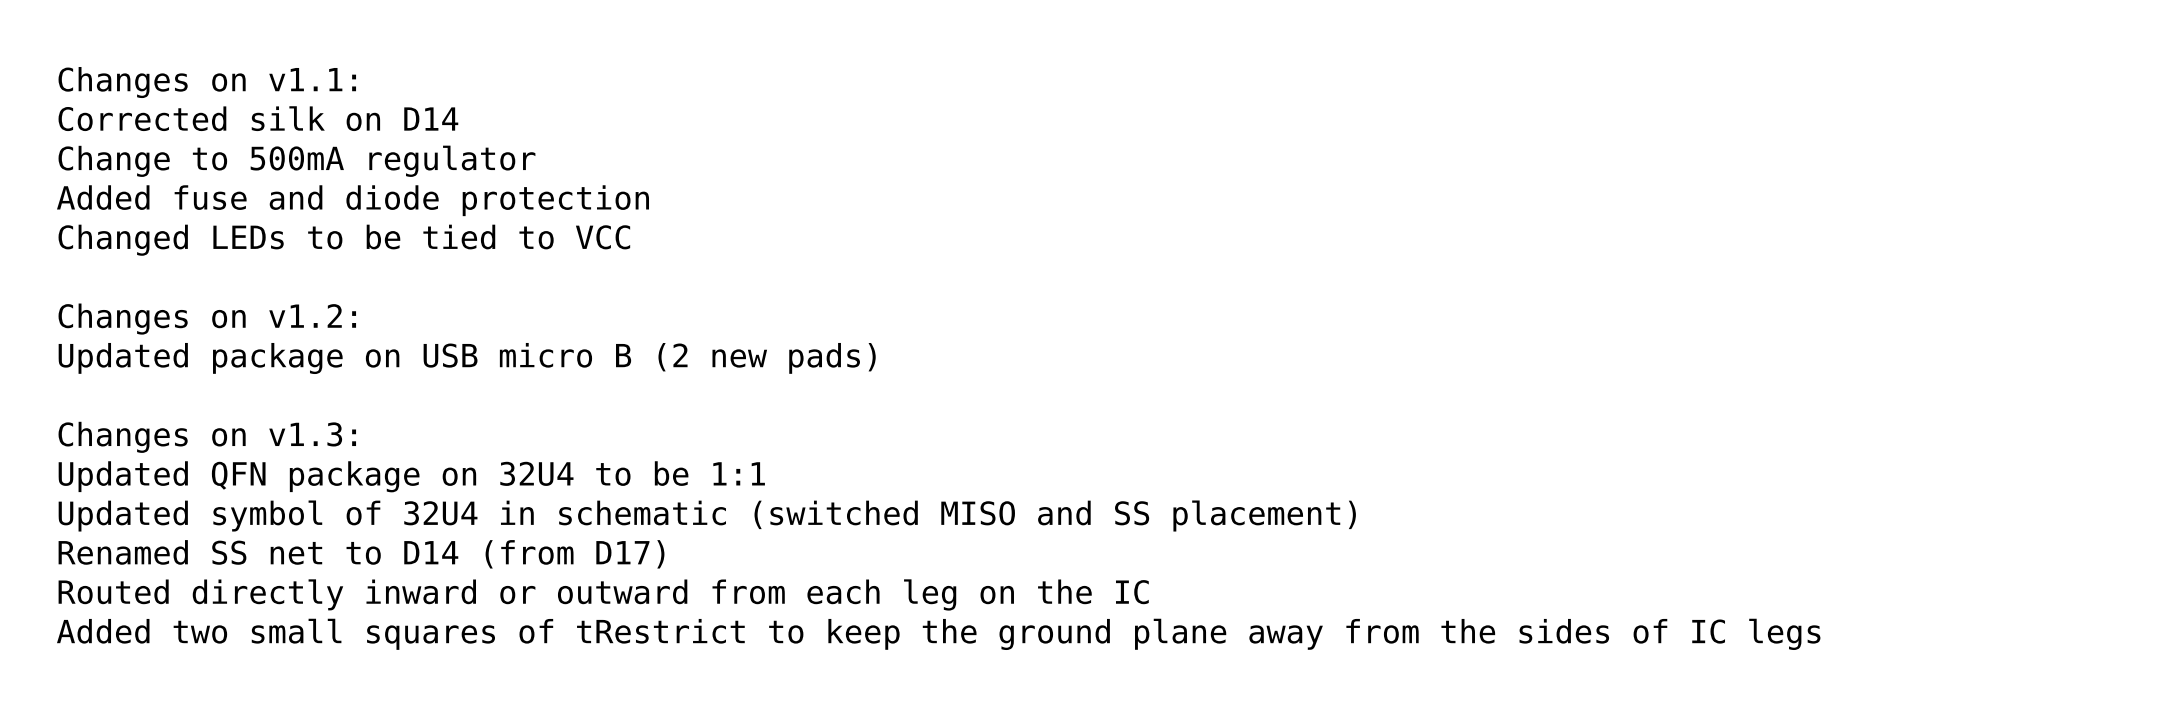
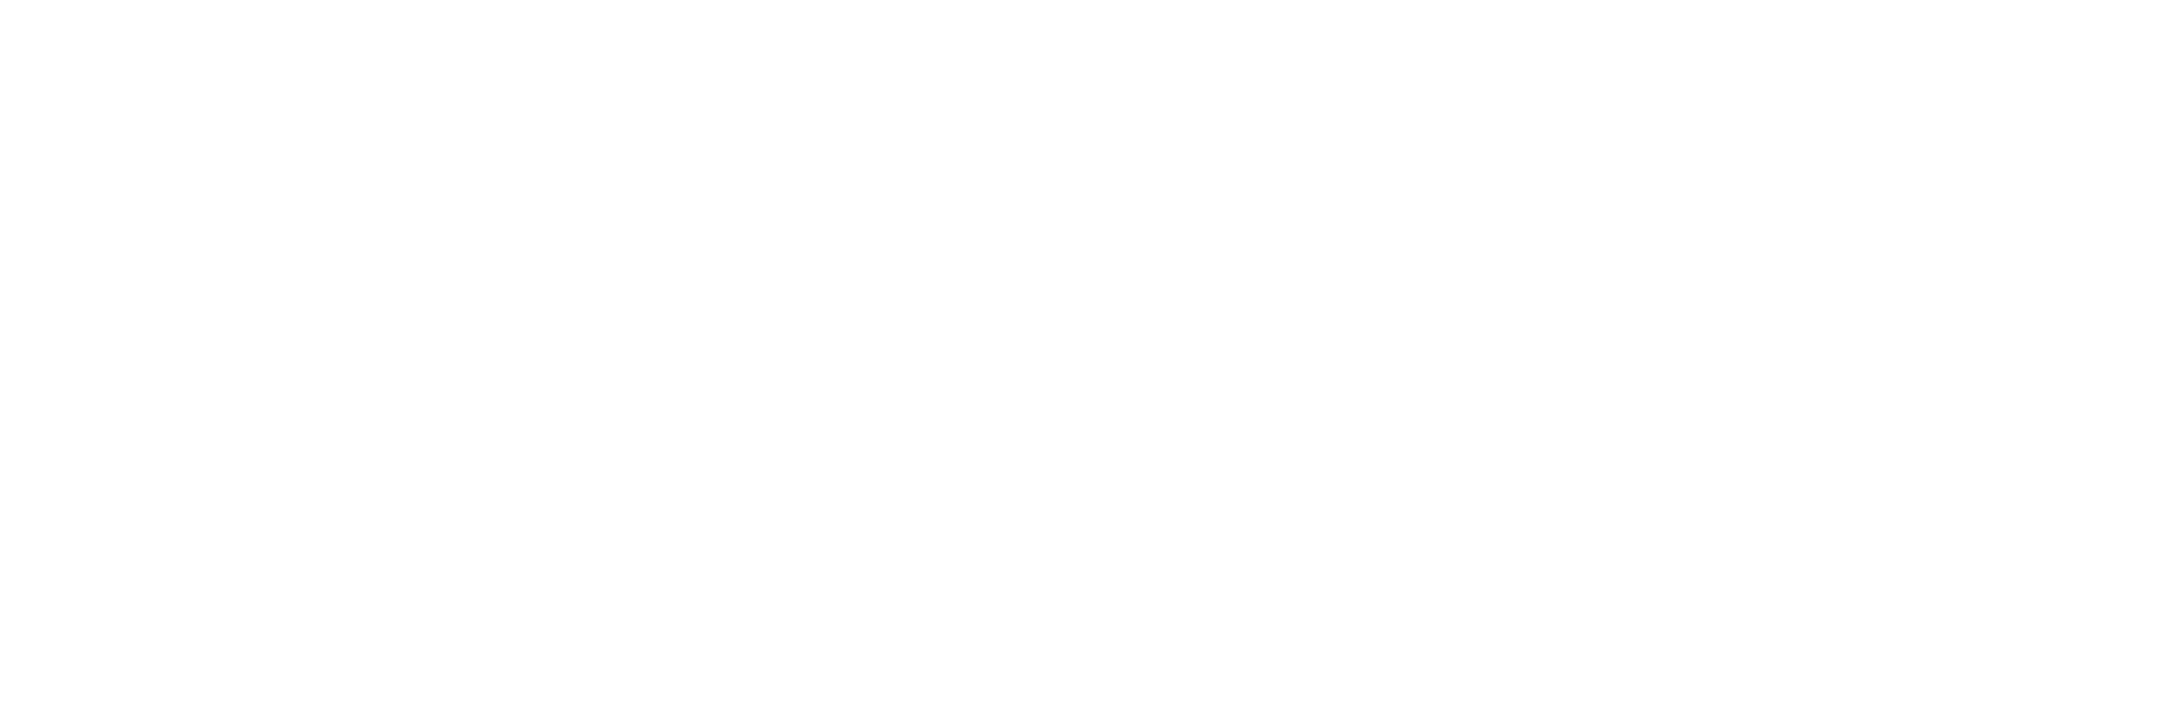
text: Changes on v1.1: (207, 82) -> none
text: Corrected silk on D14 (258, 118) -> none
text: Change to 500mA regulator (296, 161) -> none
text: Added fuse and diode protection (352, 200) -> none
text: Changed LEDs to be tied to VCC (344, 240) -> none
text: Changes on v1.2: (207, 319) -> none
text: Updated package on USB micro B (2 new pads) (467, 358) -> none
text: Changes on v1.3: (207, 437) -> none
text: Updated QFN package on 32U4 to be 1:1 (411, 476) -> none
text: Updated symbol of 32U4 in schematic (switched MISO and SS placement) (707, 516) -> none
text: Renamed SS net to D14 (from D17) (361, 554) -> none
text: Routed directly inward or outward from each leg on the IC (603, 594) -> none
text: Added two small squares of tRestrict to keep the ground plane away from the sides of IC legs (938, 634) -> none

